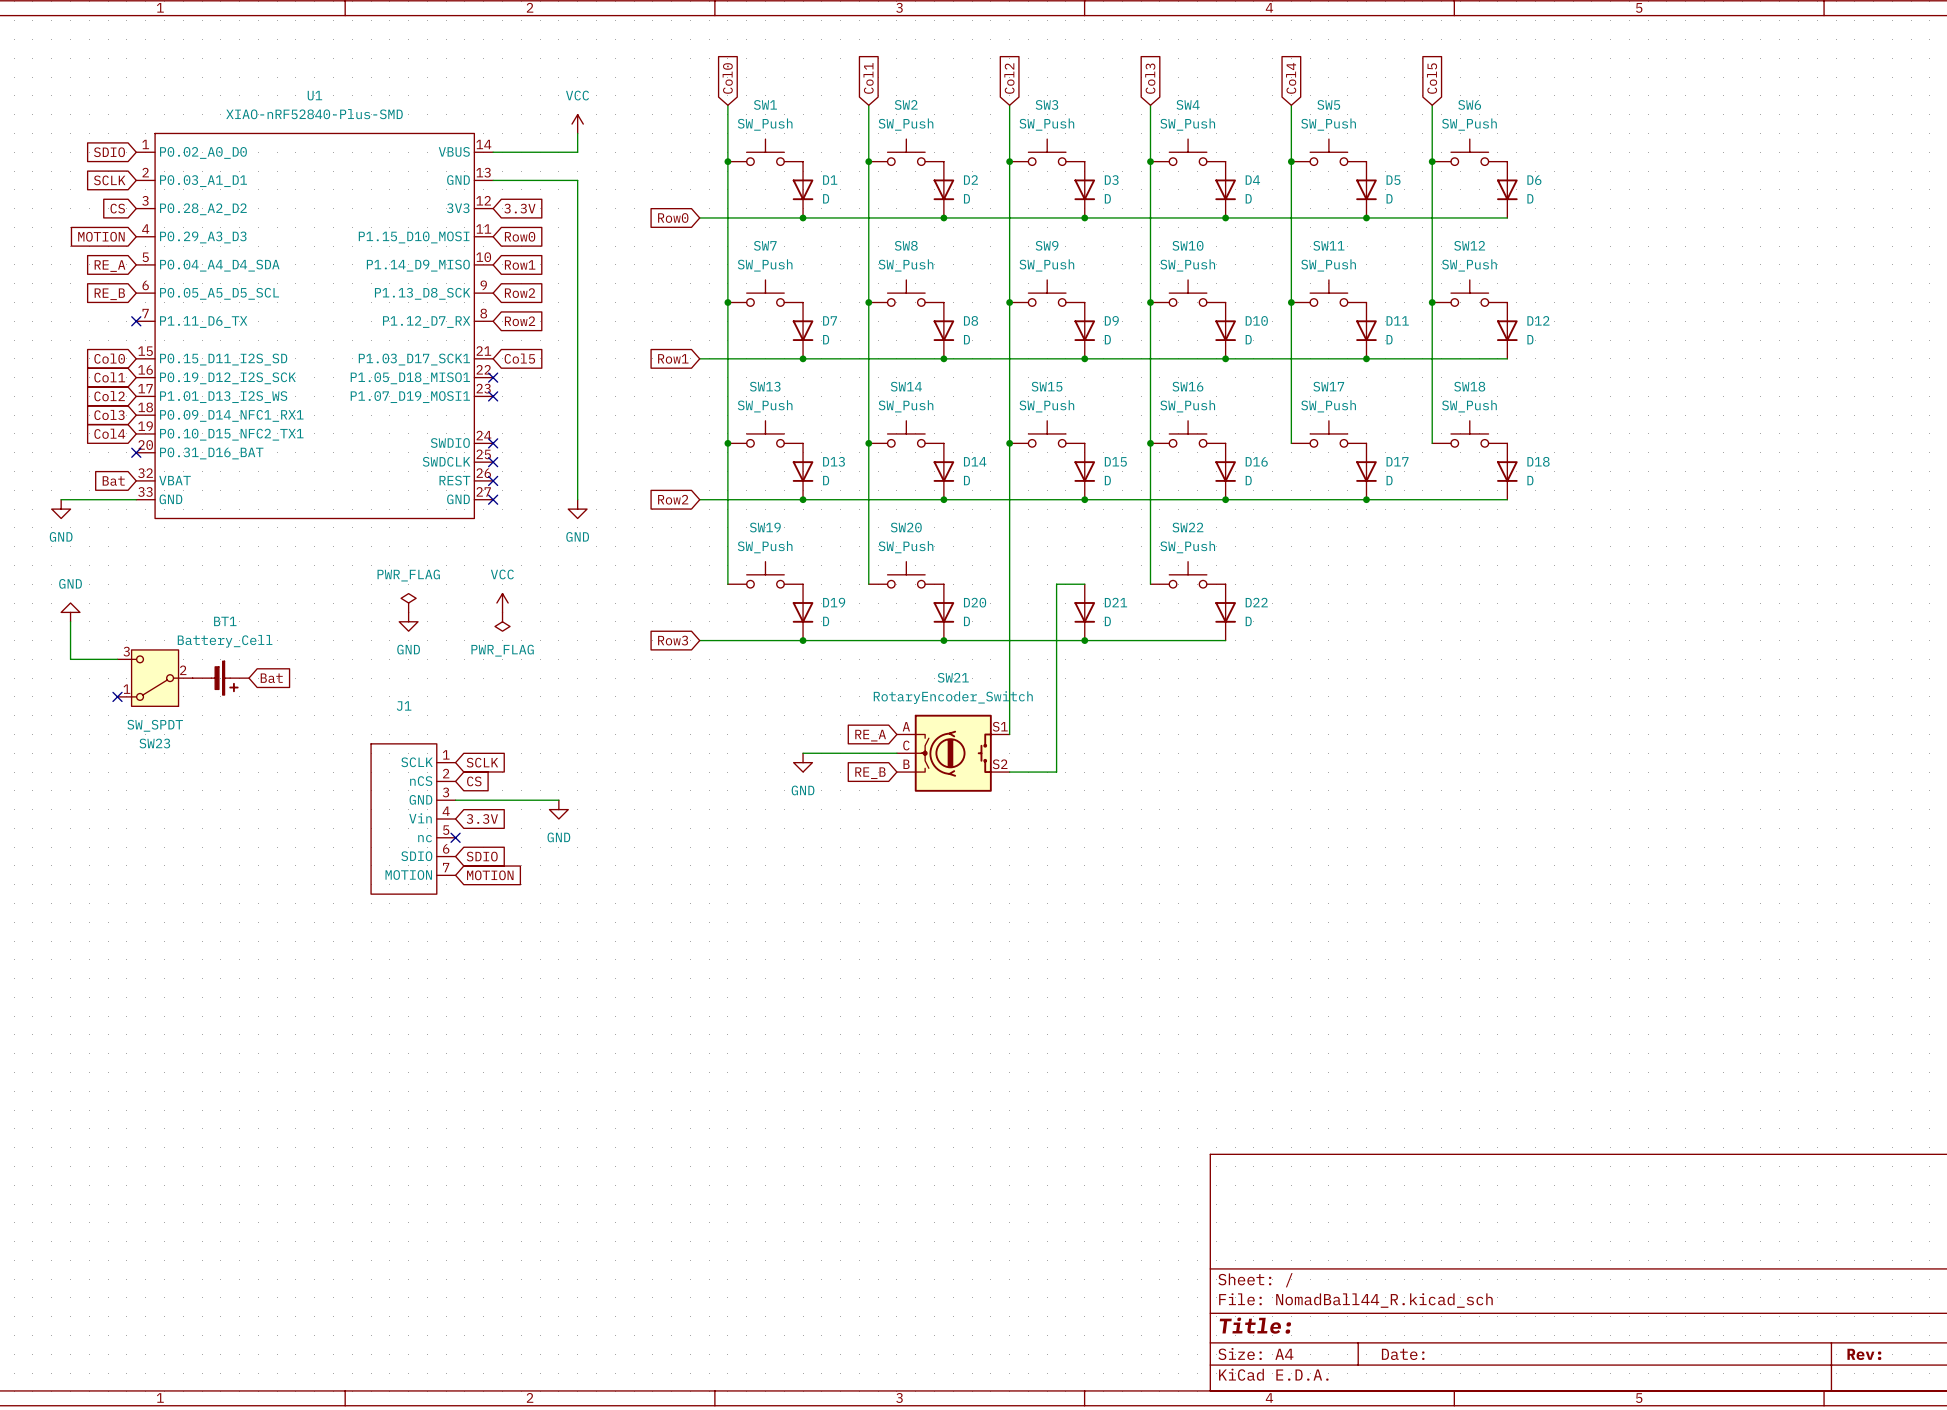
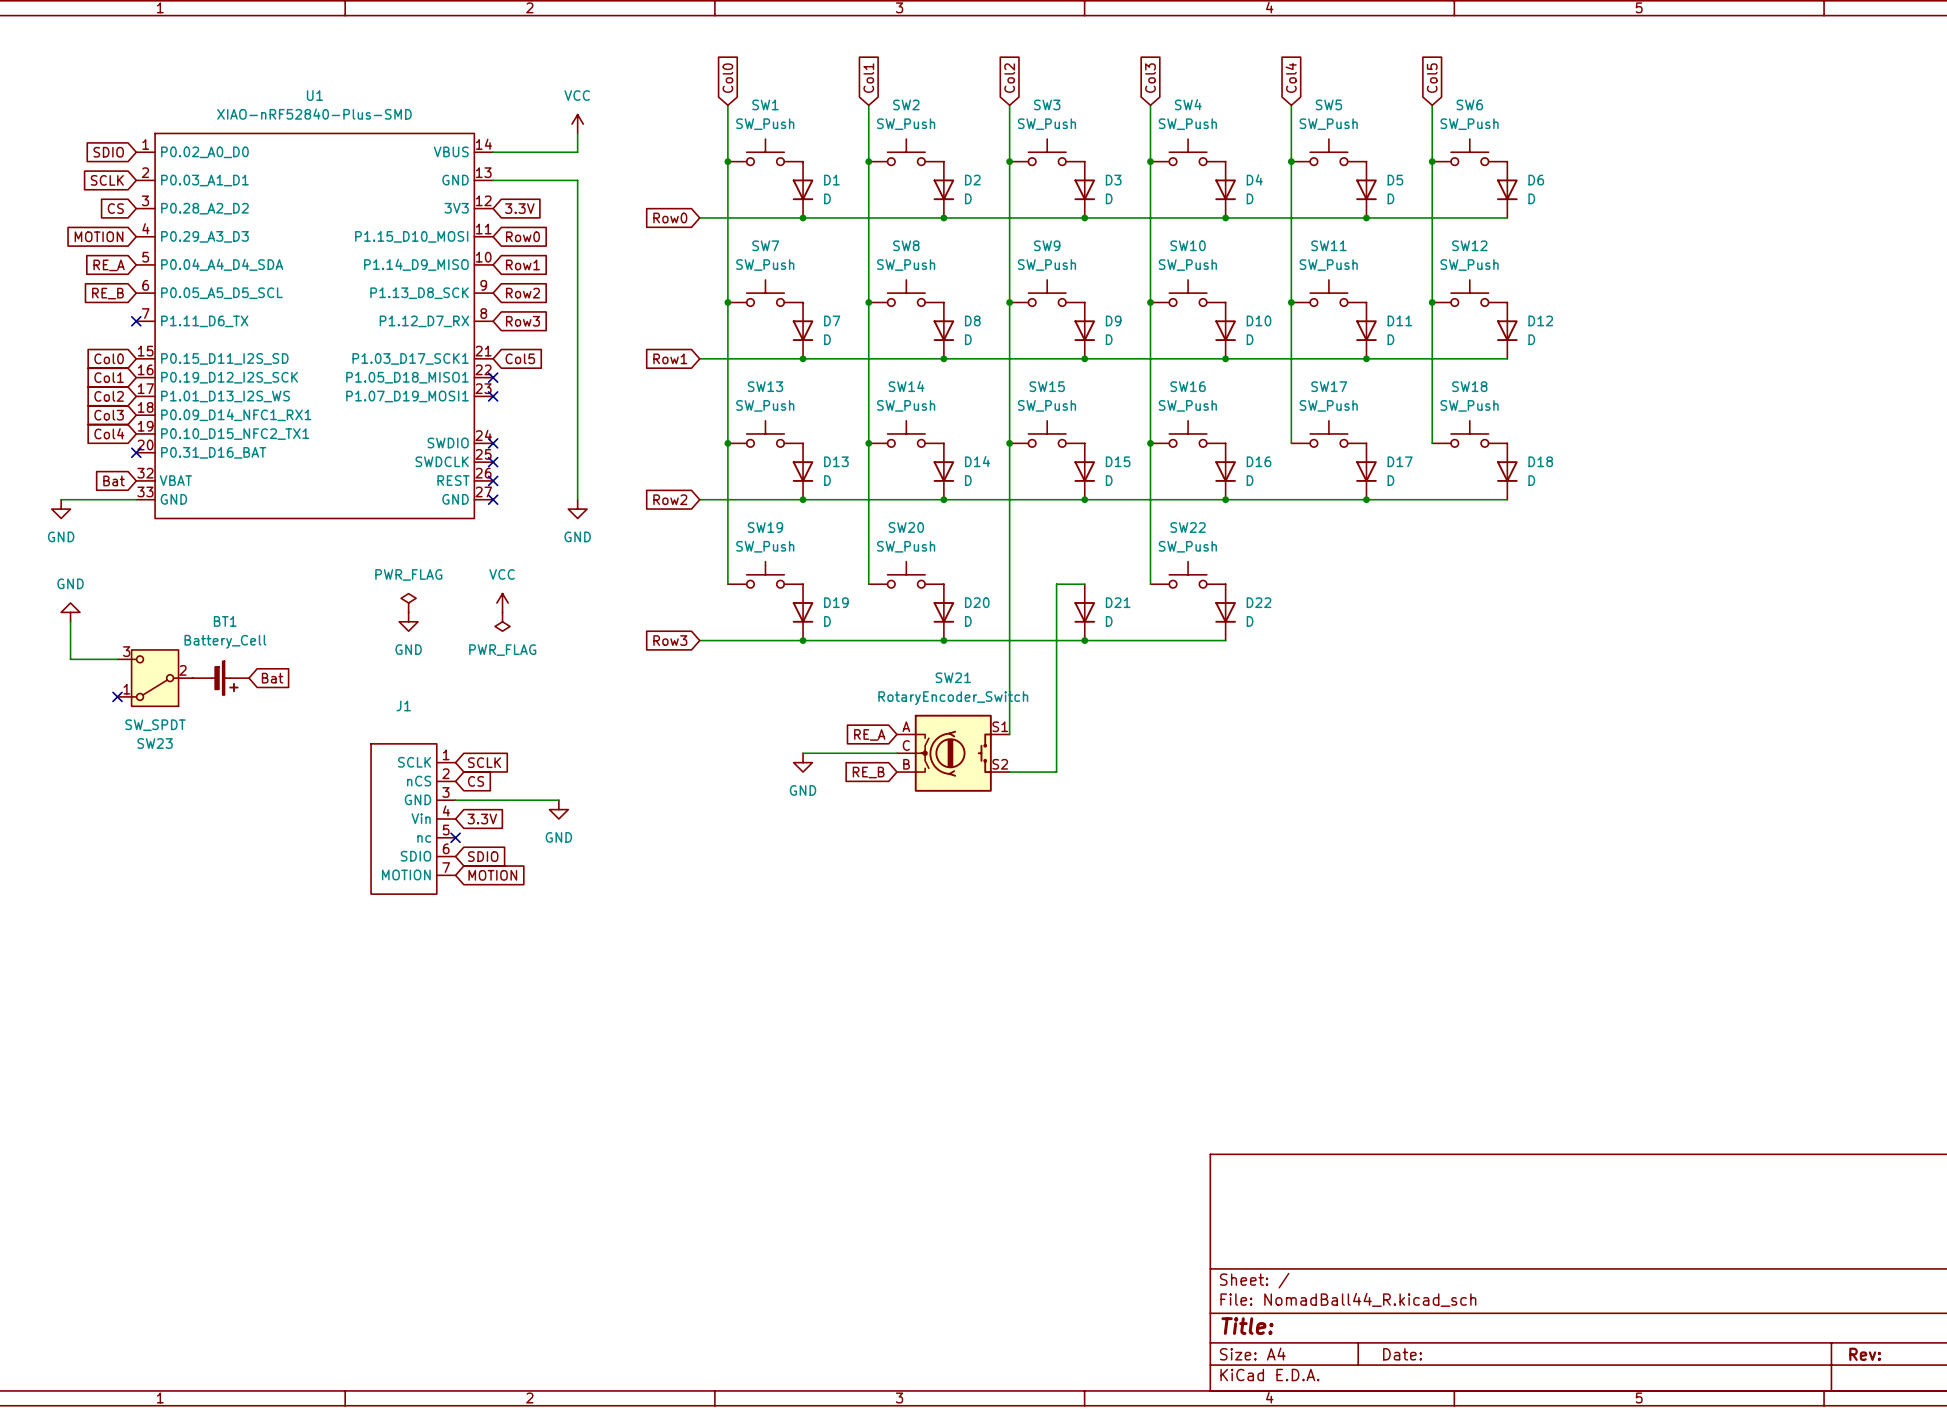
global label: Row2 (520, 321) -> Row3 (523, 321)

